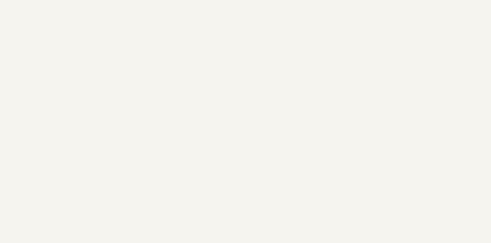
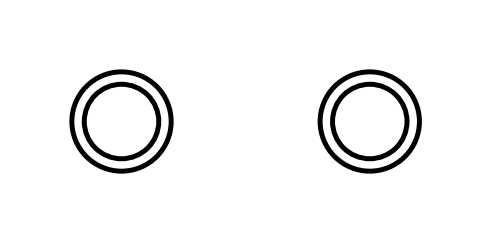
part: none -> (121, 121)
part: none -> (369, 121)

